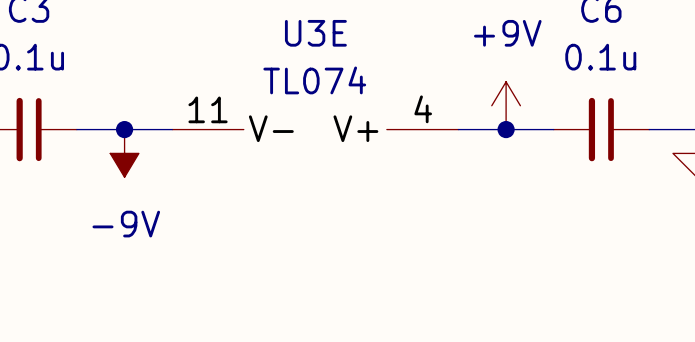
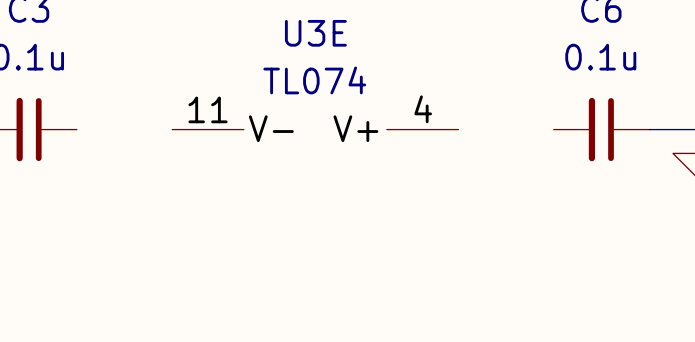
power symbol: +9V (506, 105) -> none
wire: (76, 129) (172, 129) -> none
junction: (124, 129) -> none
wire: (458, 129) (553, 129) -> none
junction: (506, 129) -> none
power symbol: -9V (124, 153) -> none

